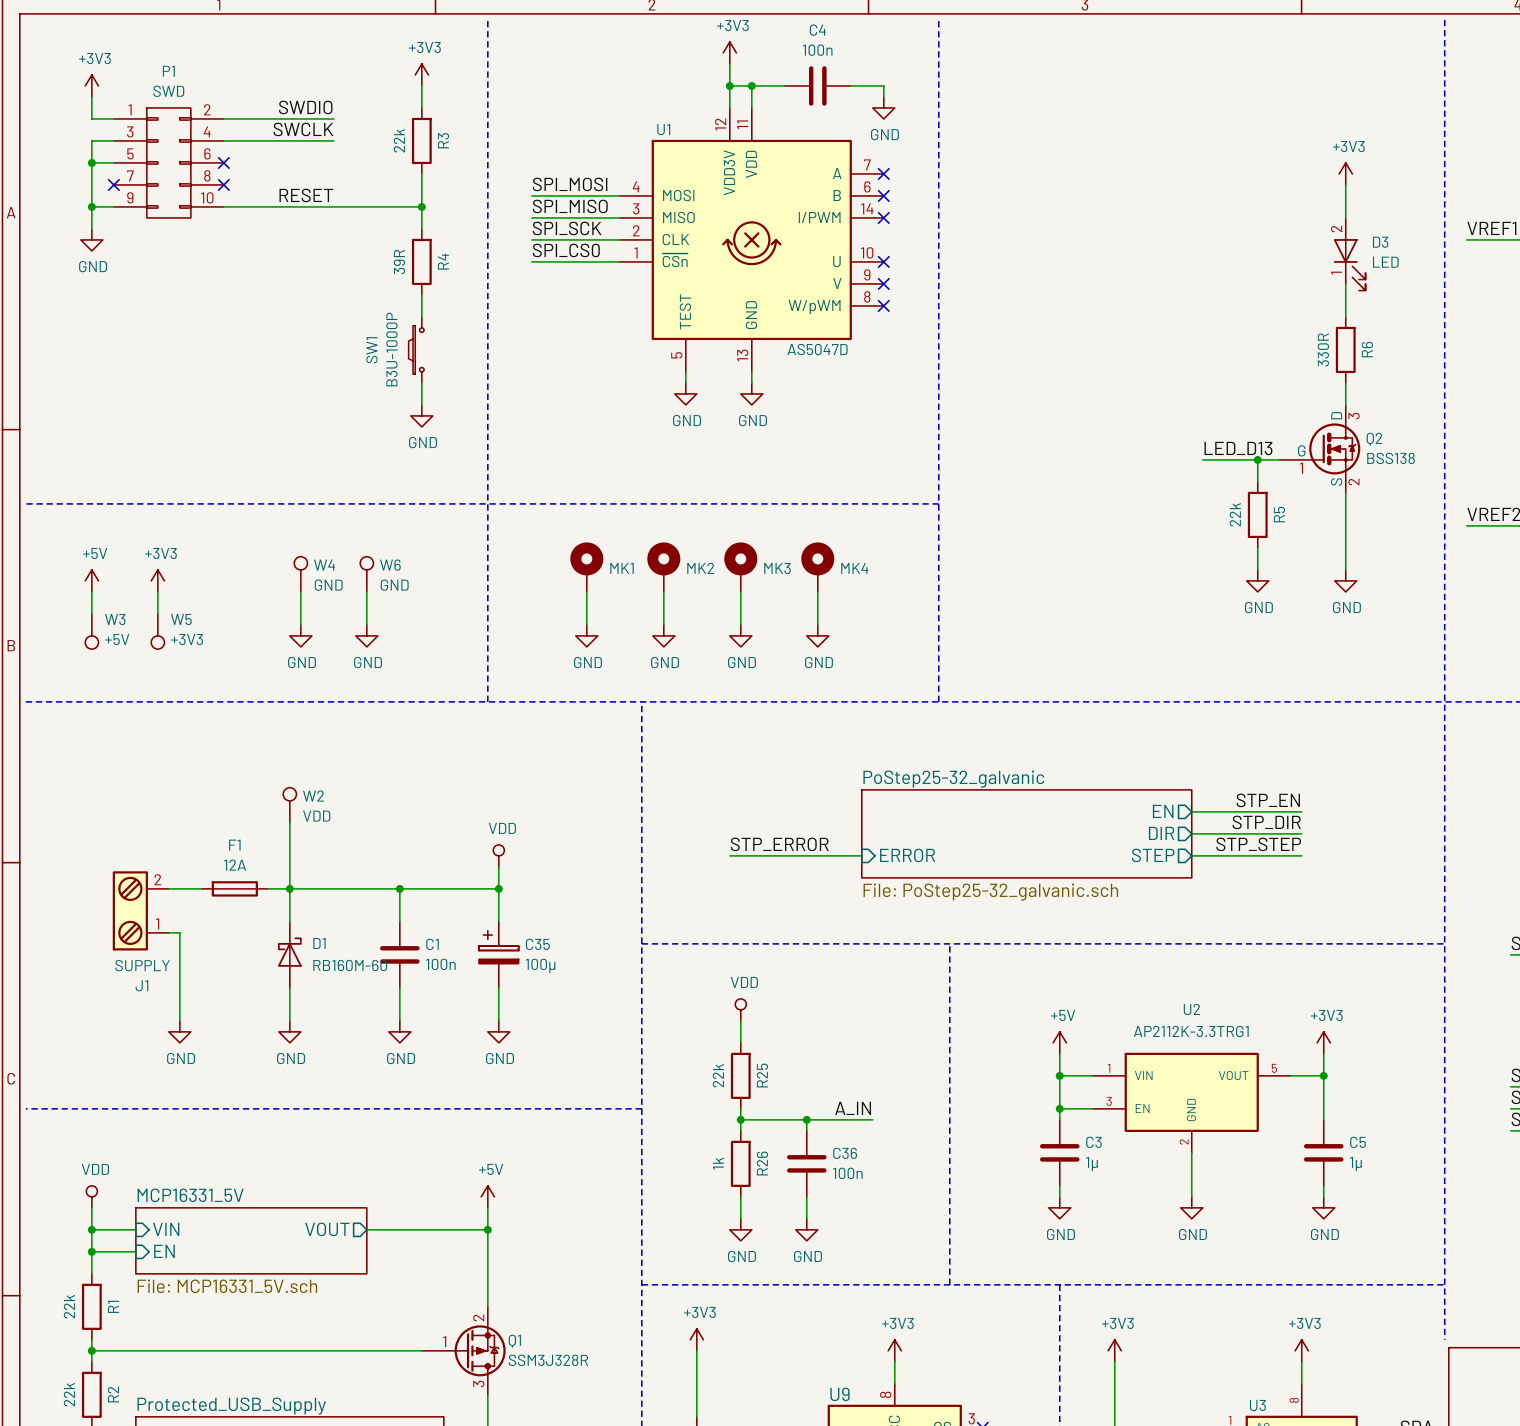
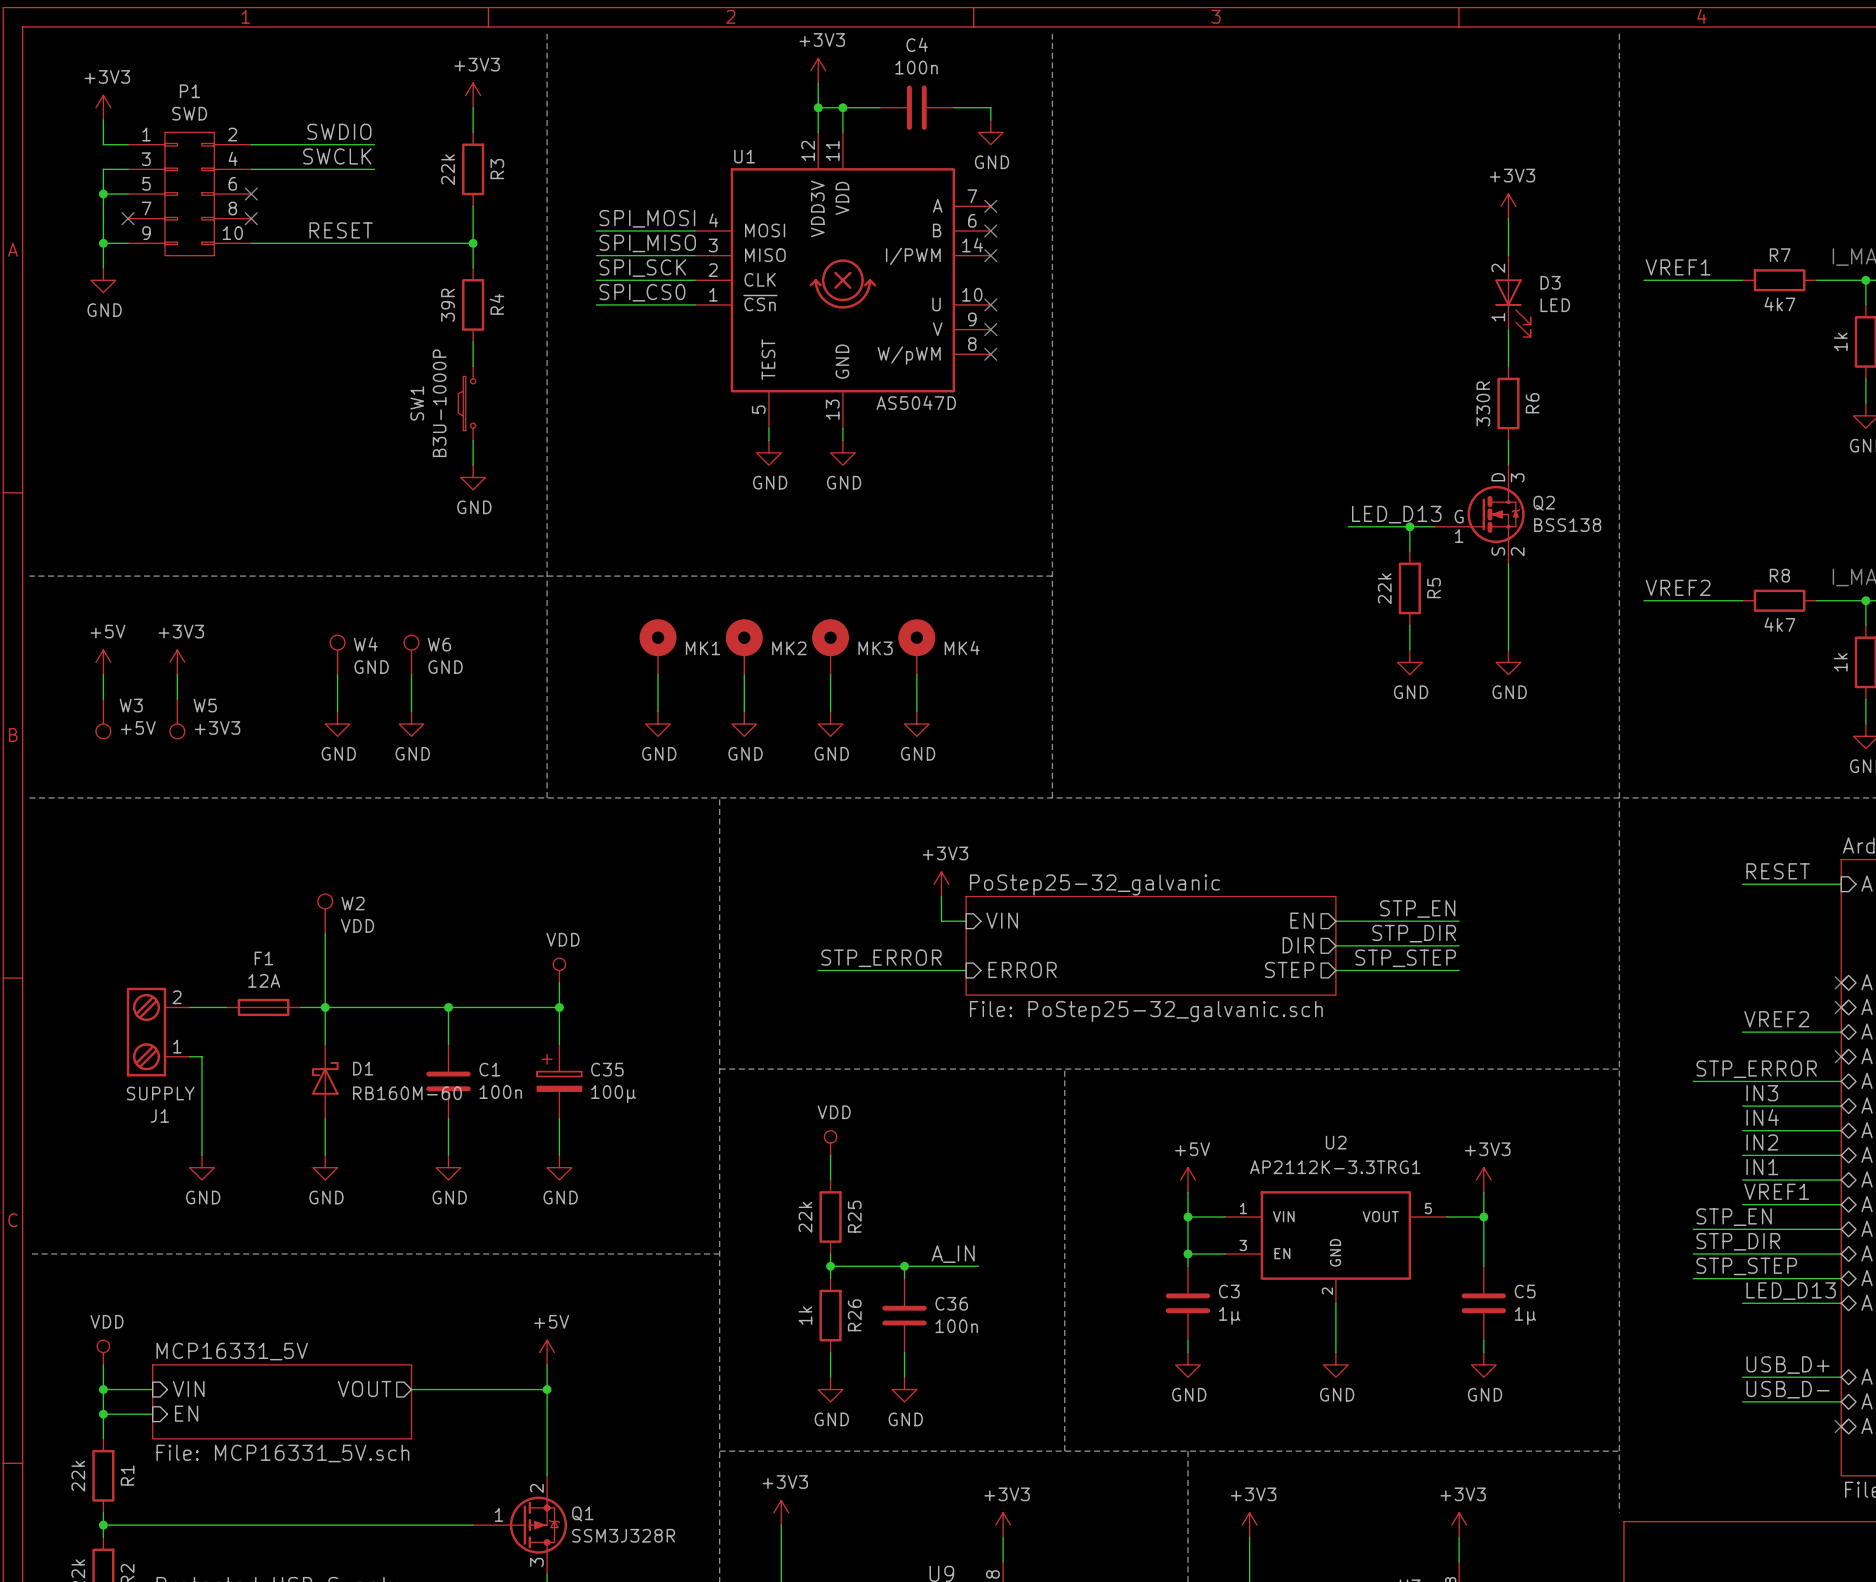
power symbol: none -> +3V3 (941, 884)
wire: none -> (941, 896) (941, 921) (966, 921)
sheet pin: none -> VIN (1002, 920)

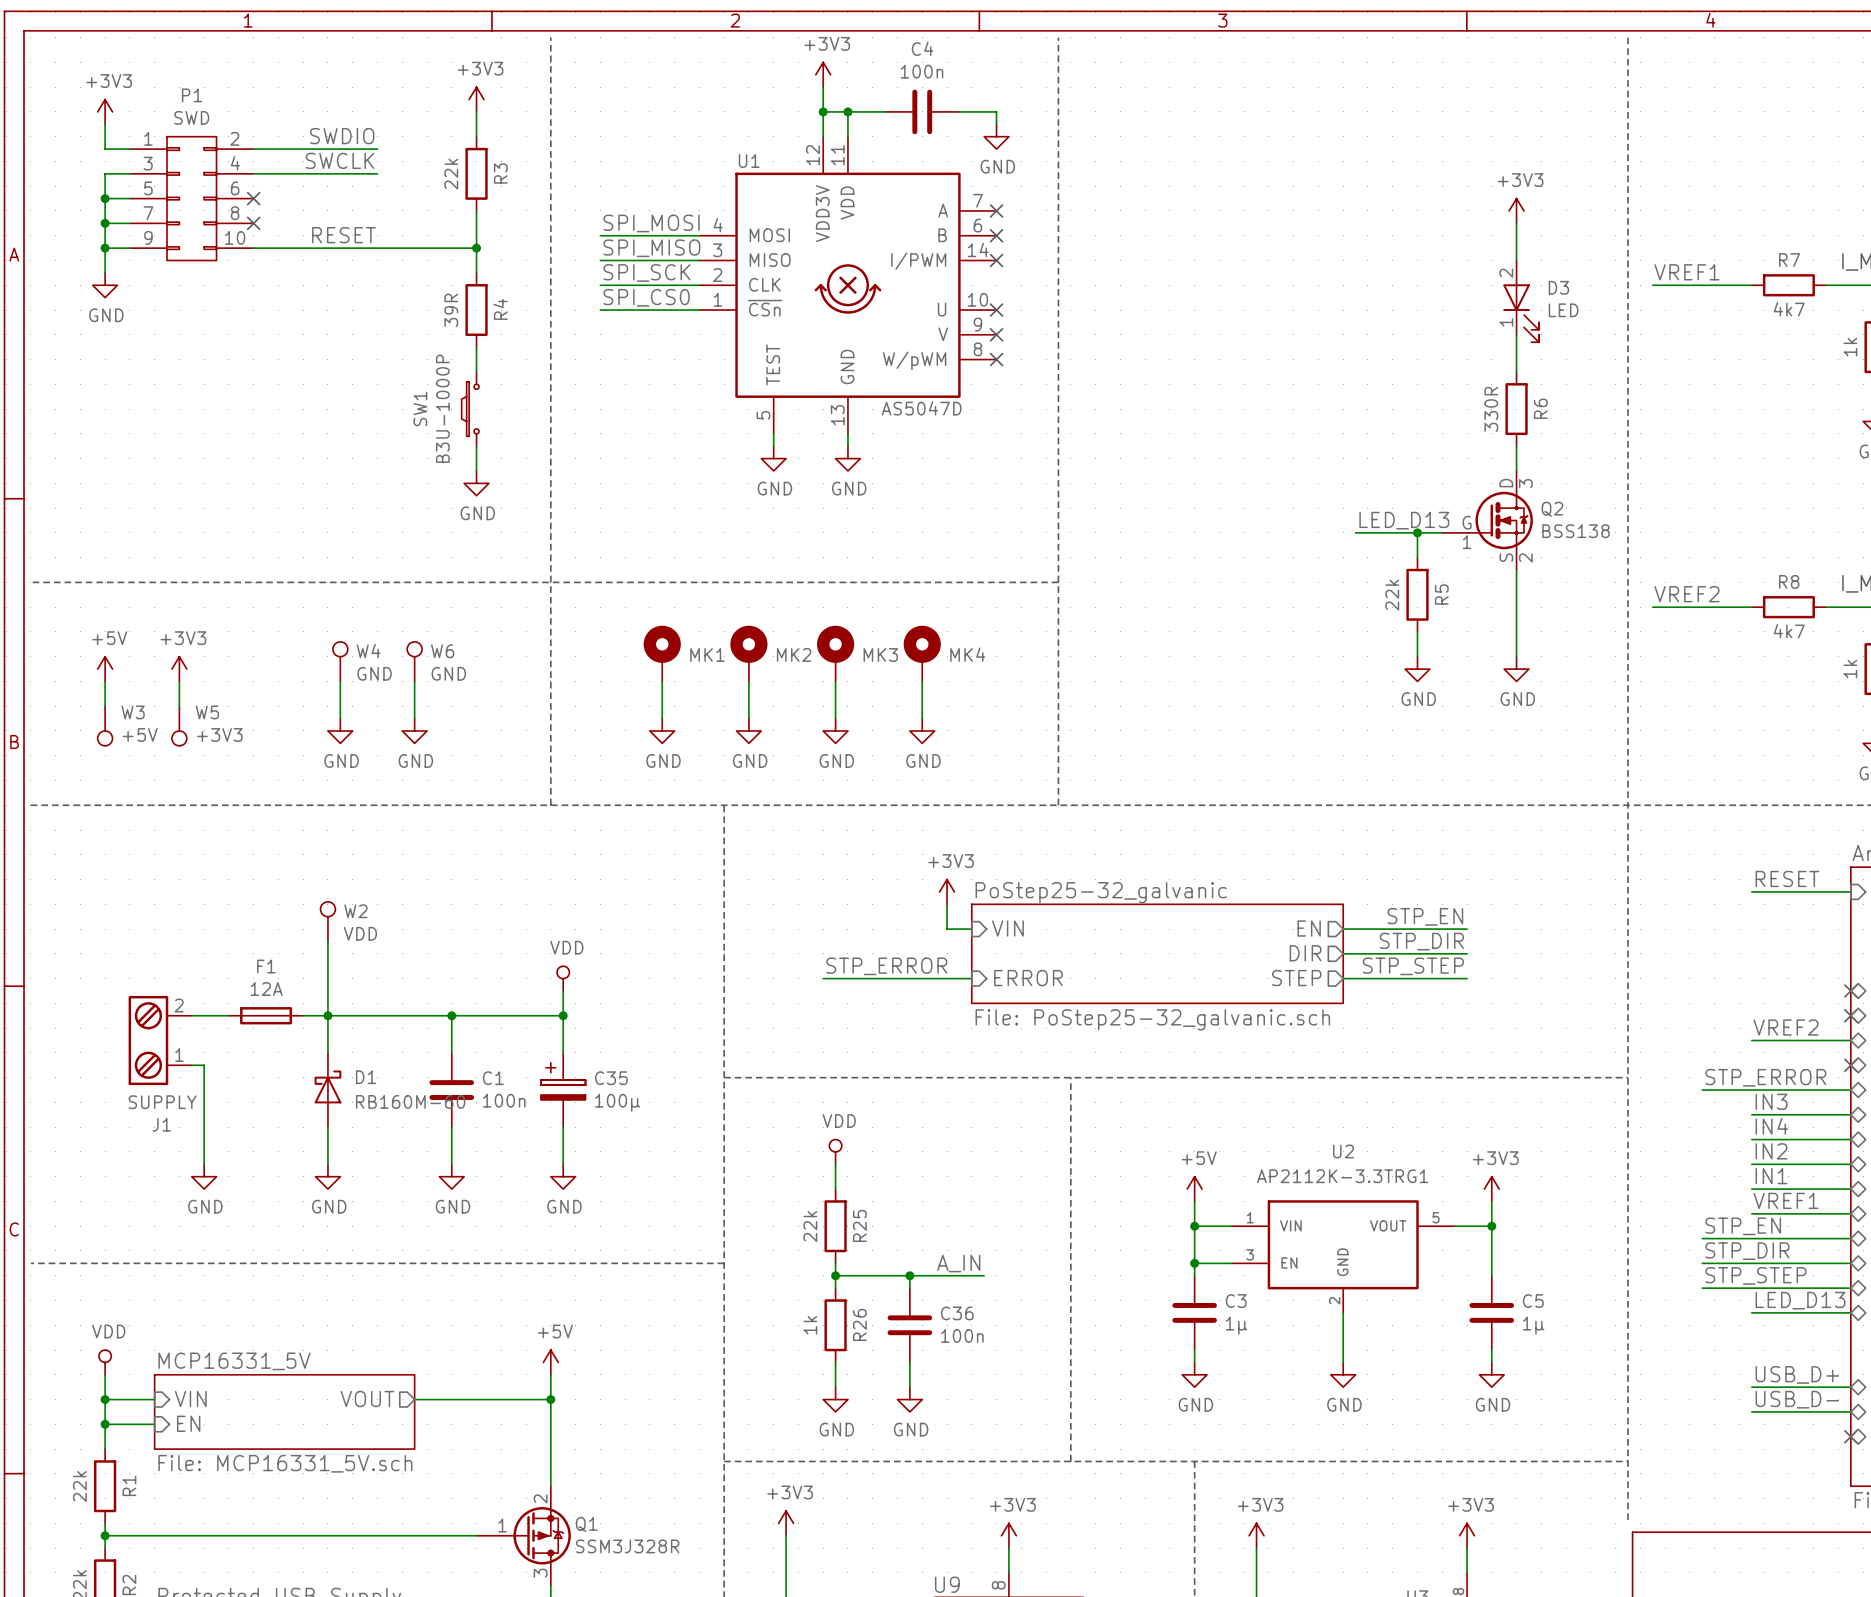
wire: none -> (105, 223) (129, 223)
junction: none -> (105, 223)
no-connect mark: (128, 218) -> none

